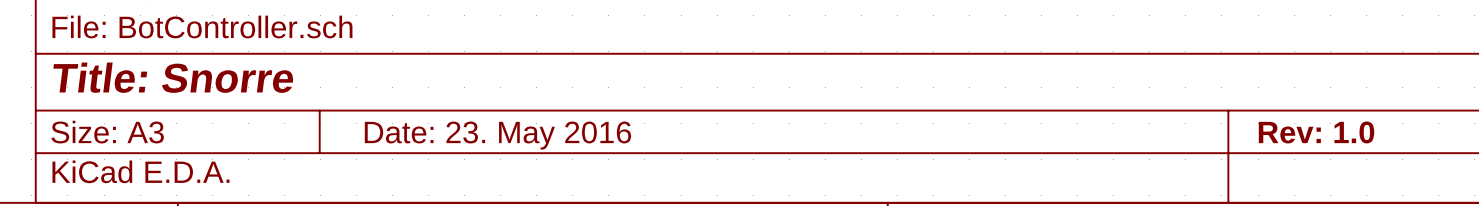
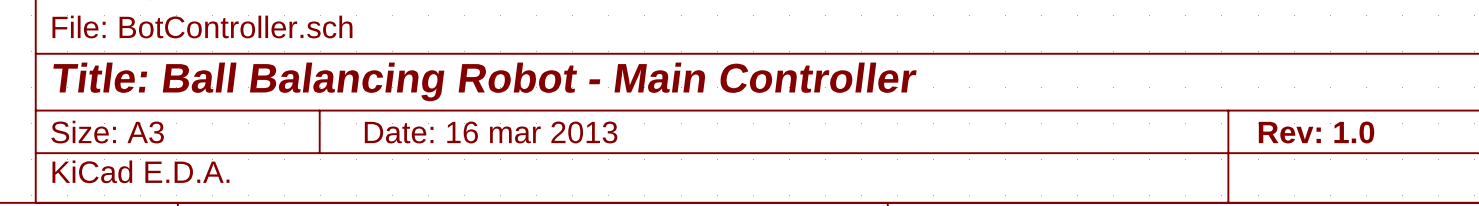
title block: Title: Snorre (173, 77) -> Title: Ball Balancing Robot - Main Controller (484, 81)
title block: Date: 23. May 2016 (497, 135) -> Date: 16 mar 2013 (491, 132)

